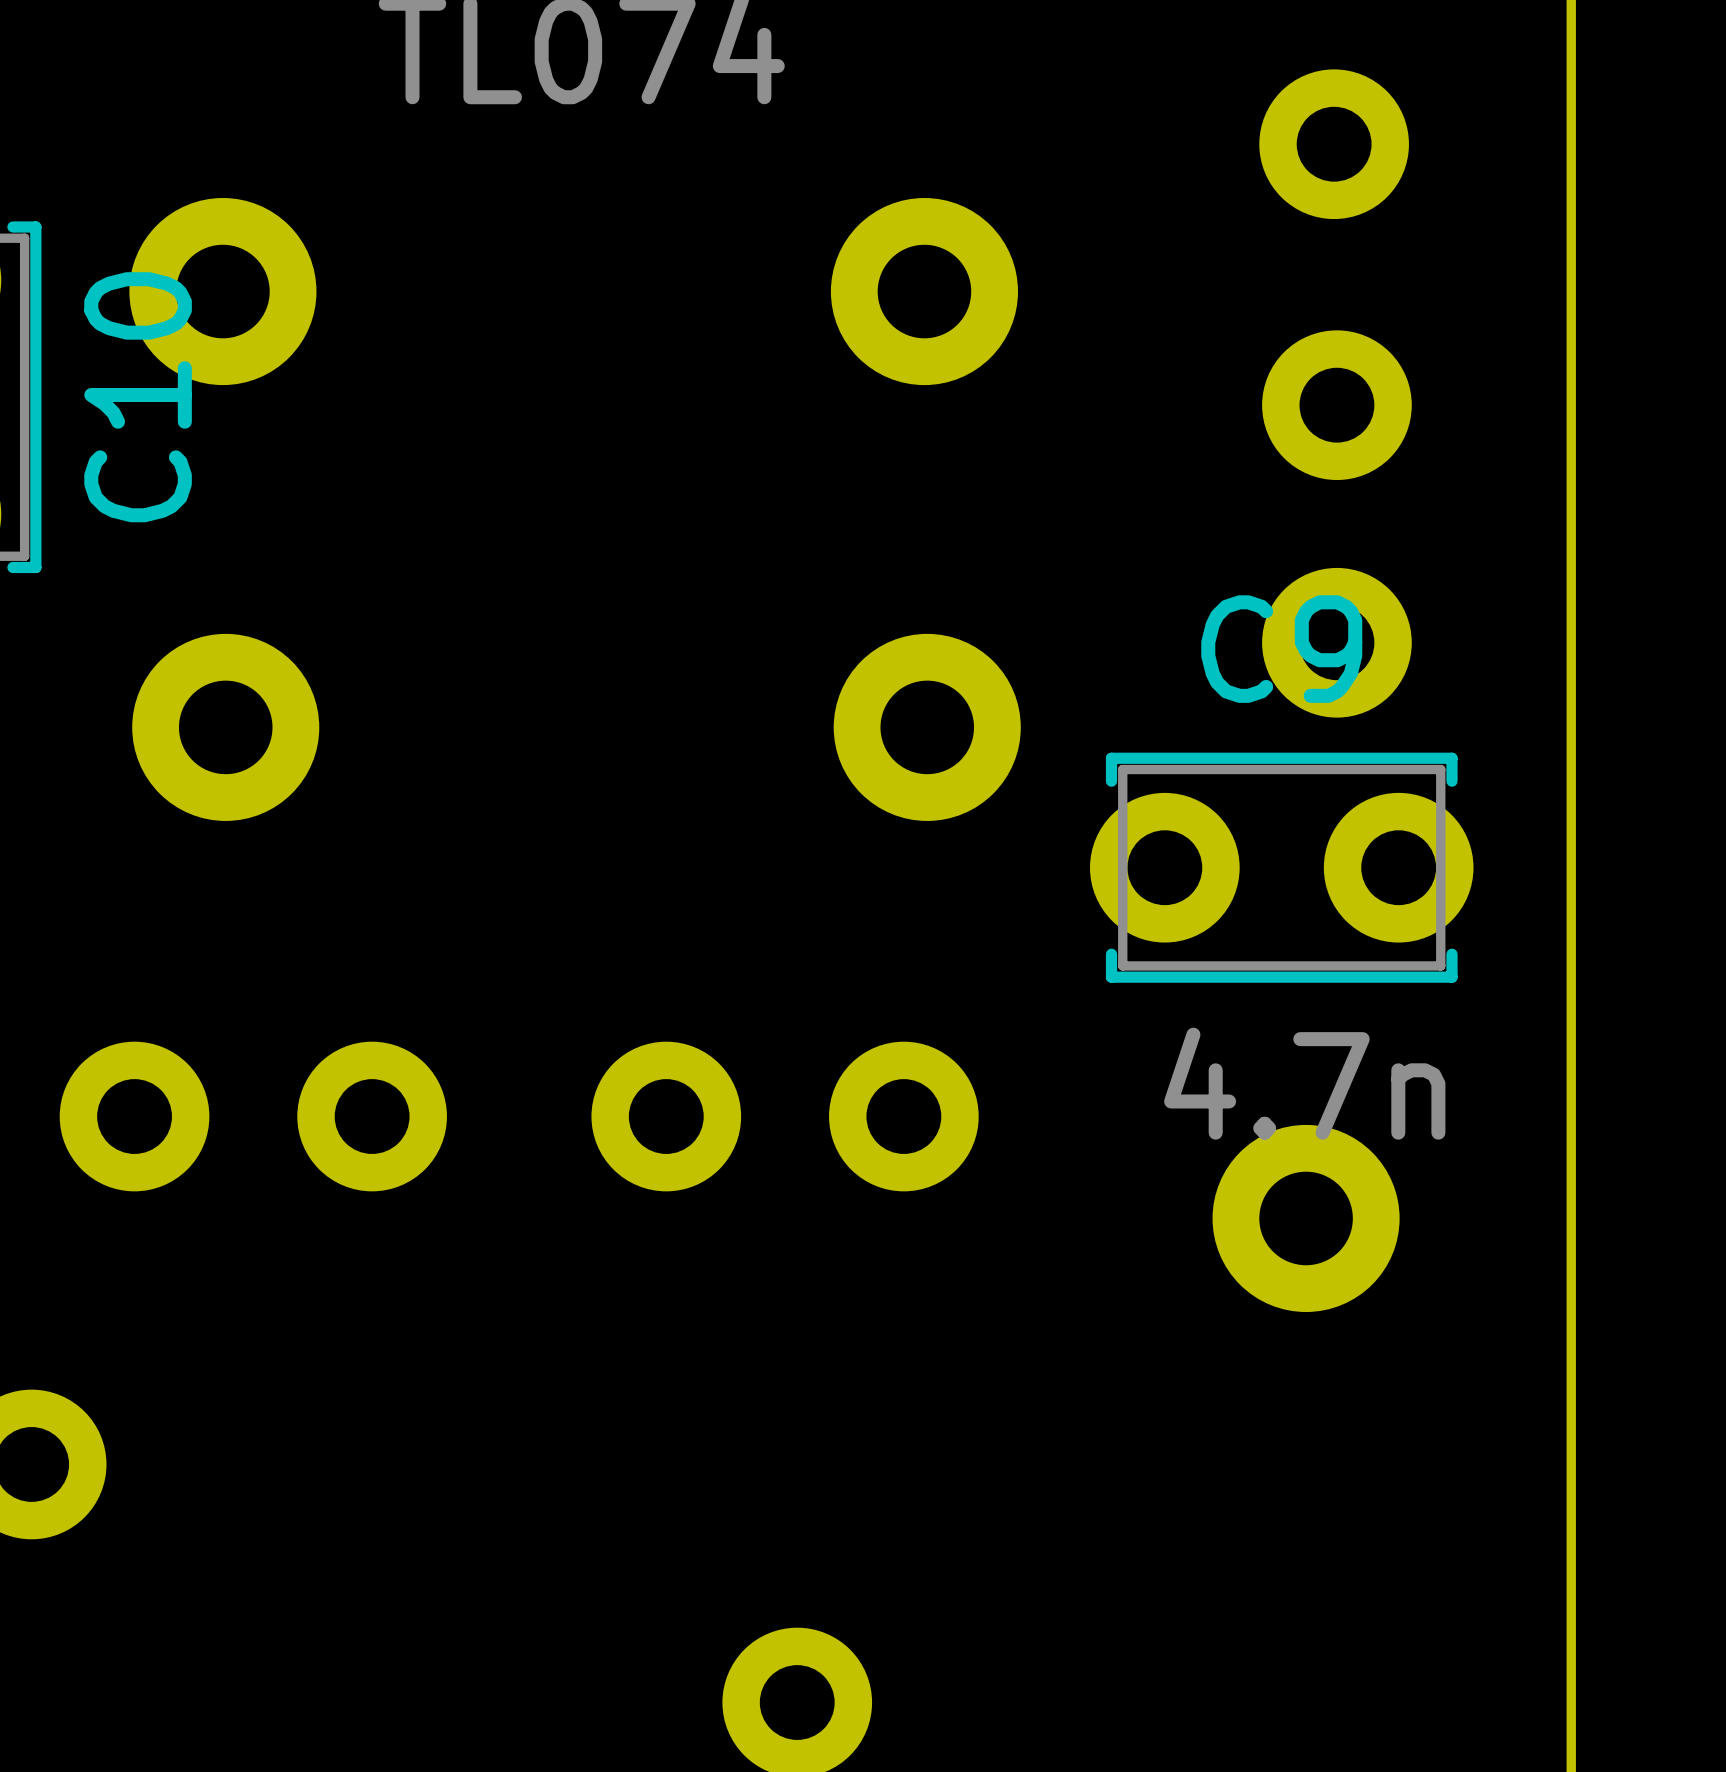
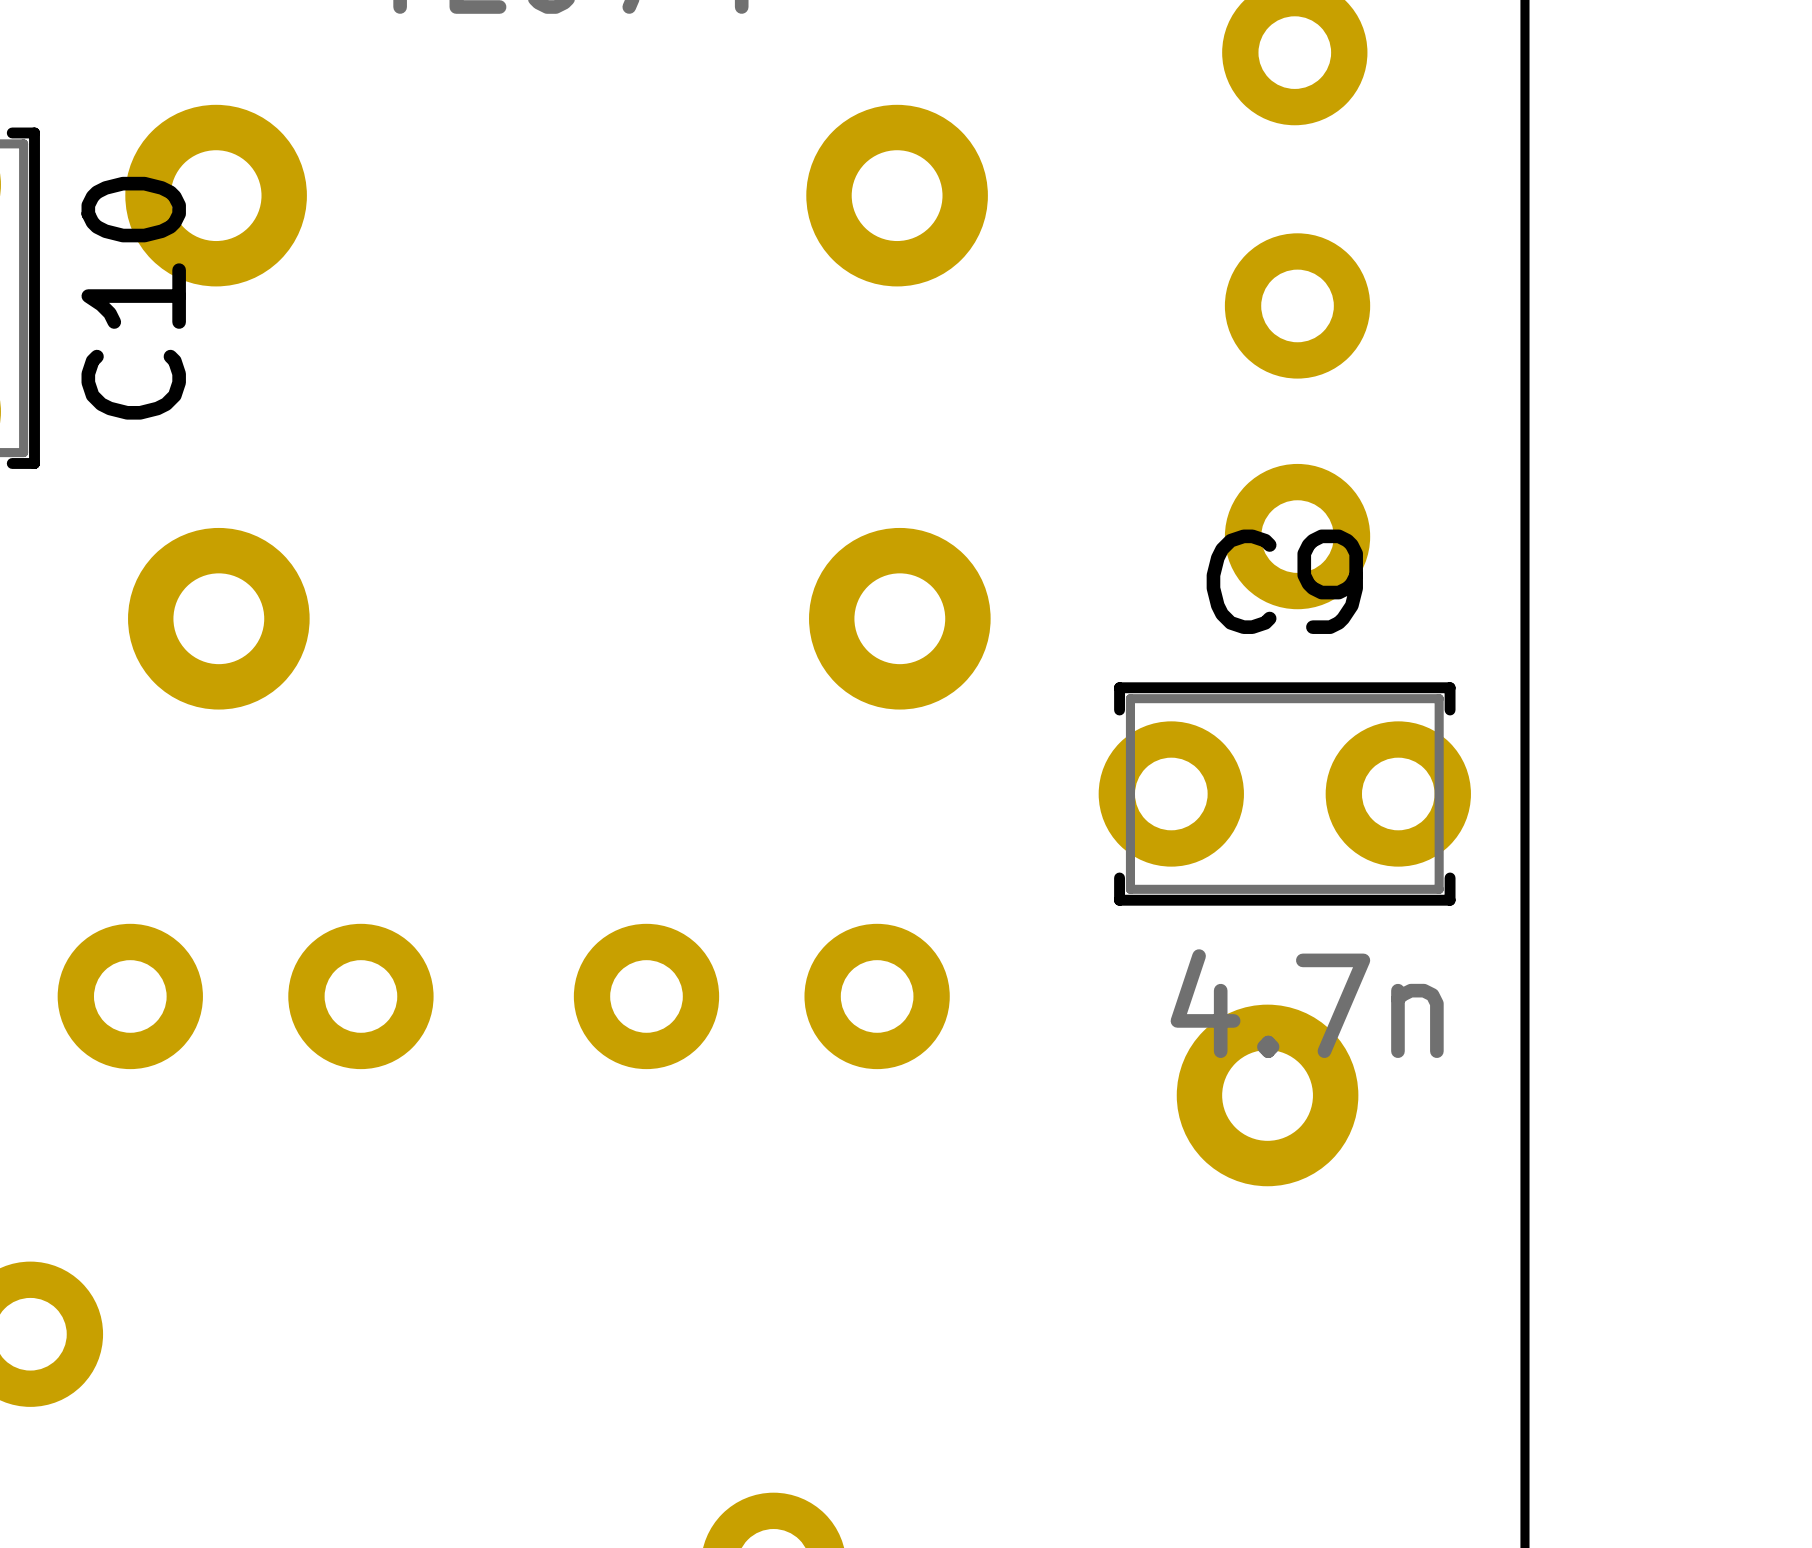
C9 position: (1281, 867) -> (1284, 793)

